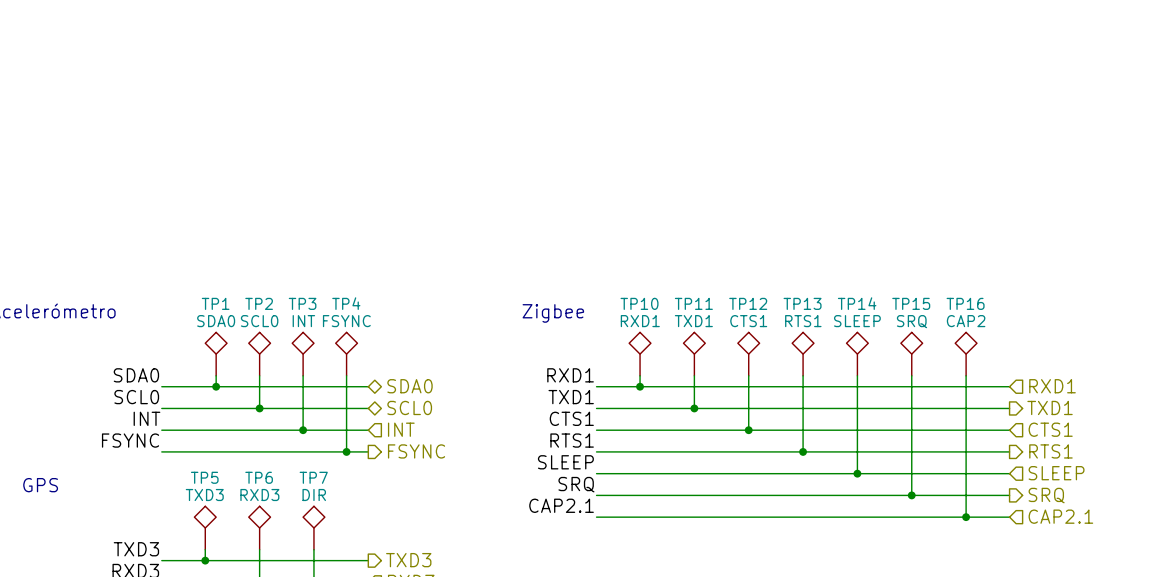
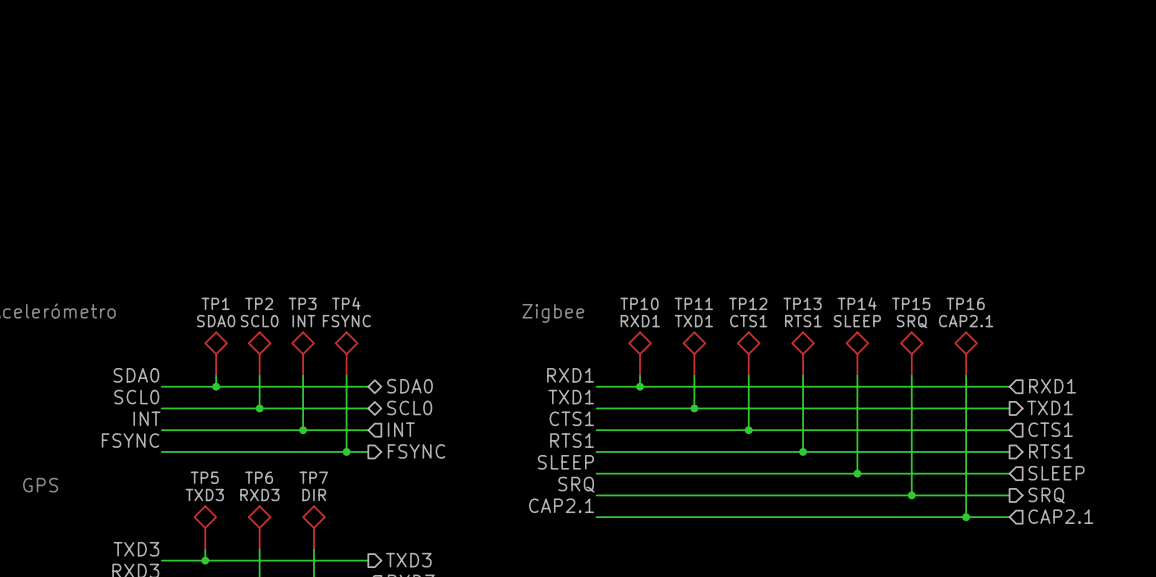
TP16 value: CAP2 (966, 321) -> CAP2.1 (966, 321)

